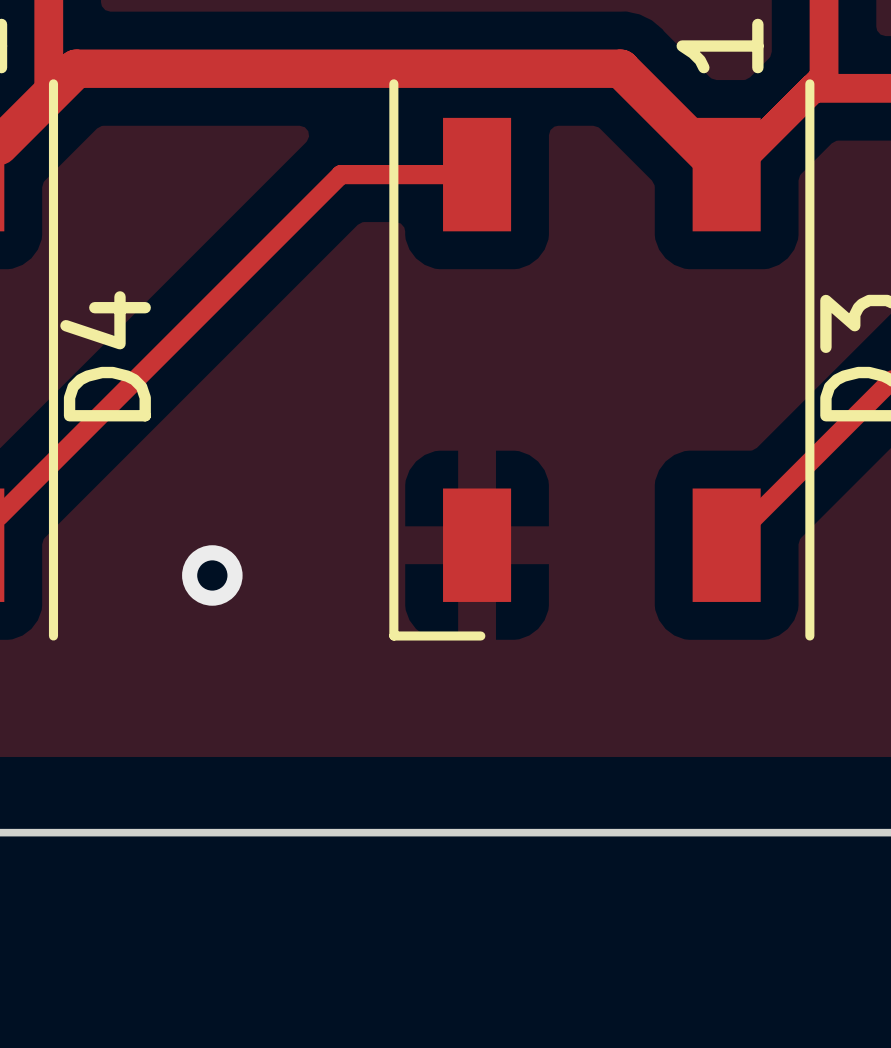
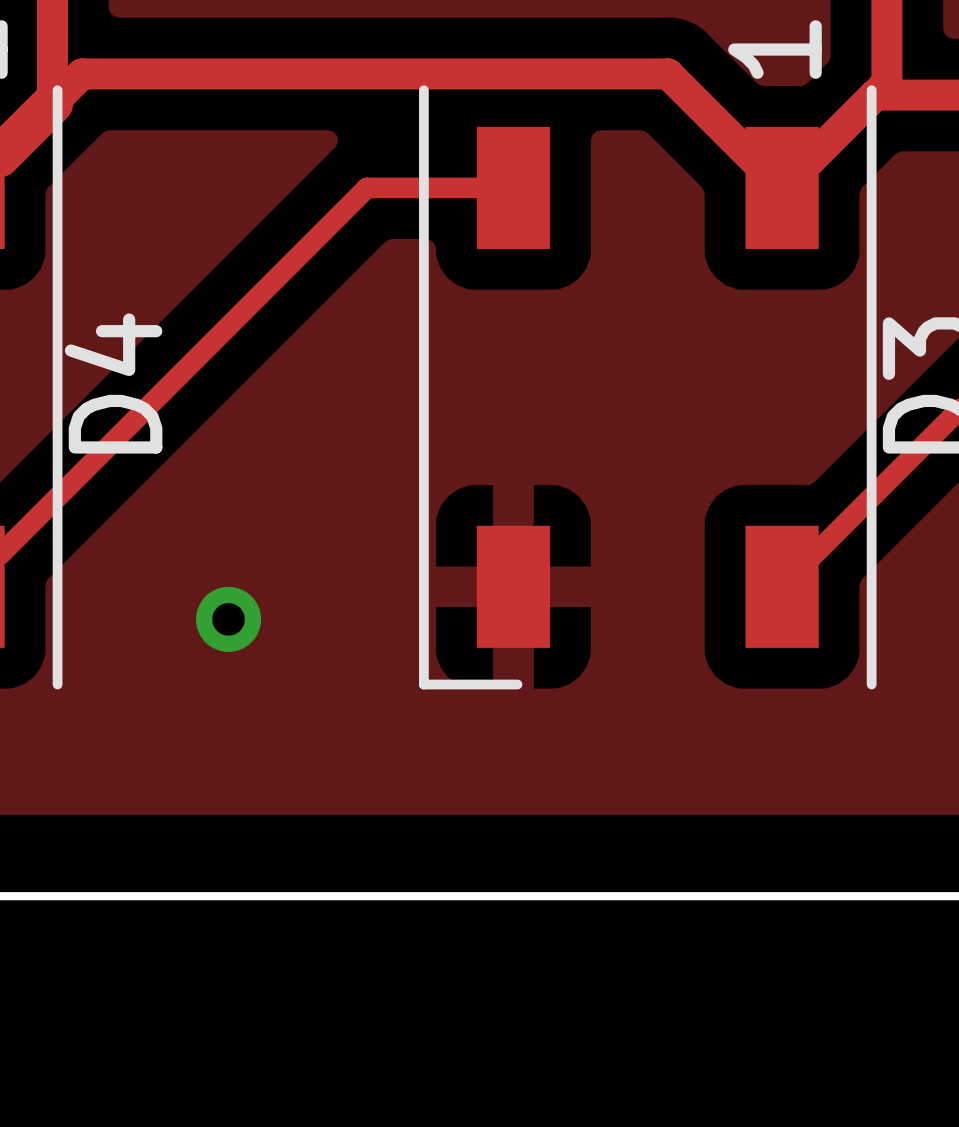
track width: thick (48, 96) (76, 68) (620, 68) (726, 174) -> thin (52, 103) (81, 73) (668, 73) (782, 187)

